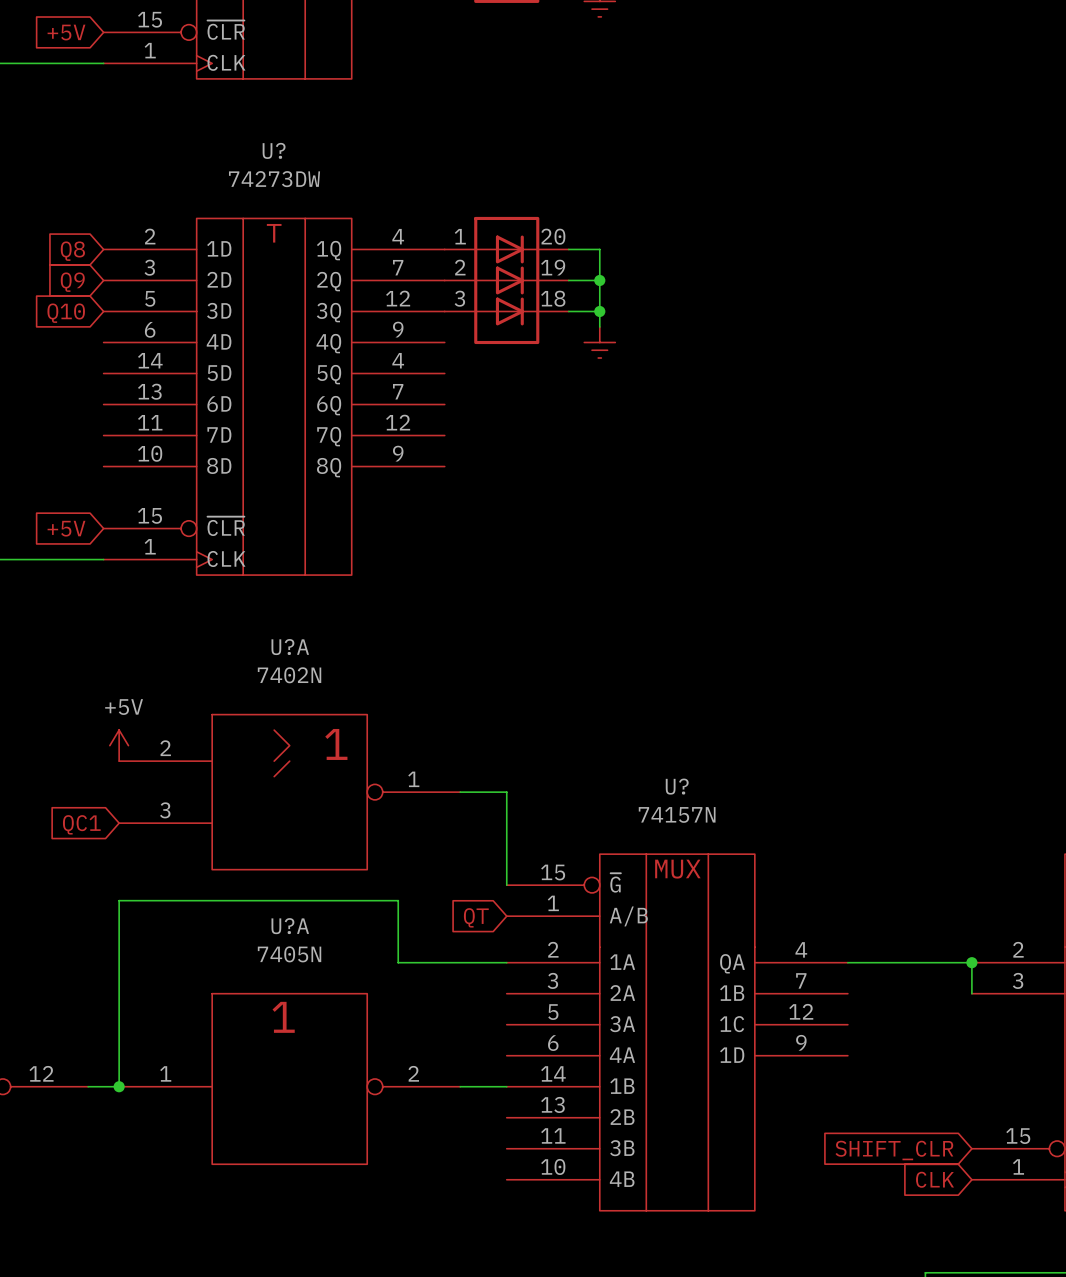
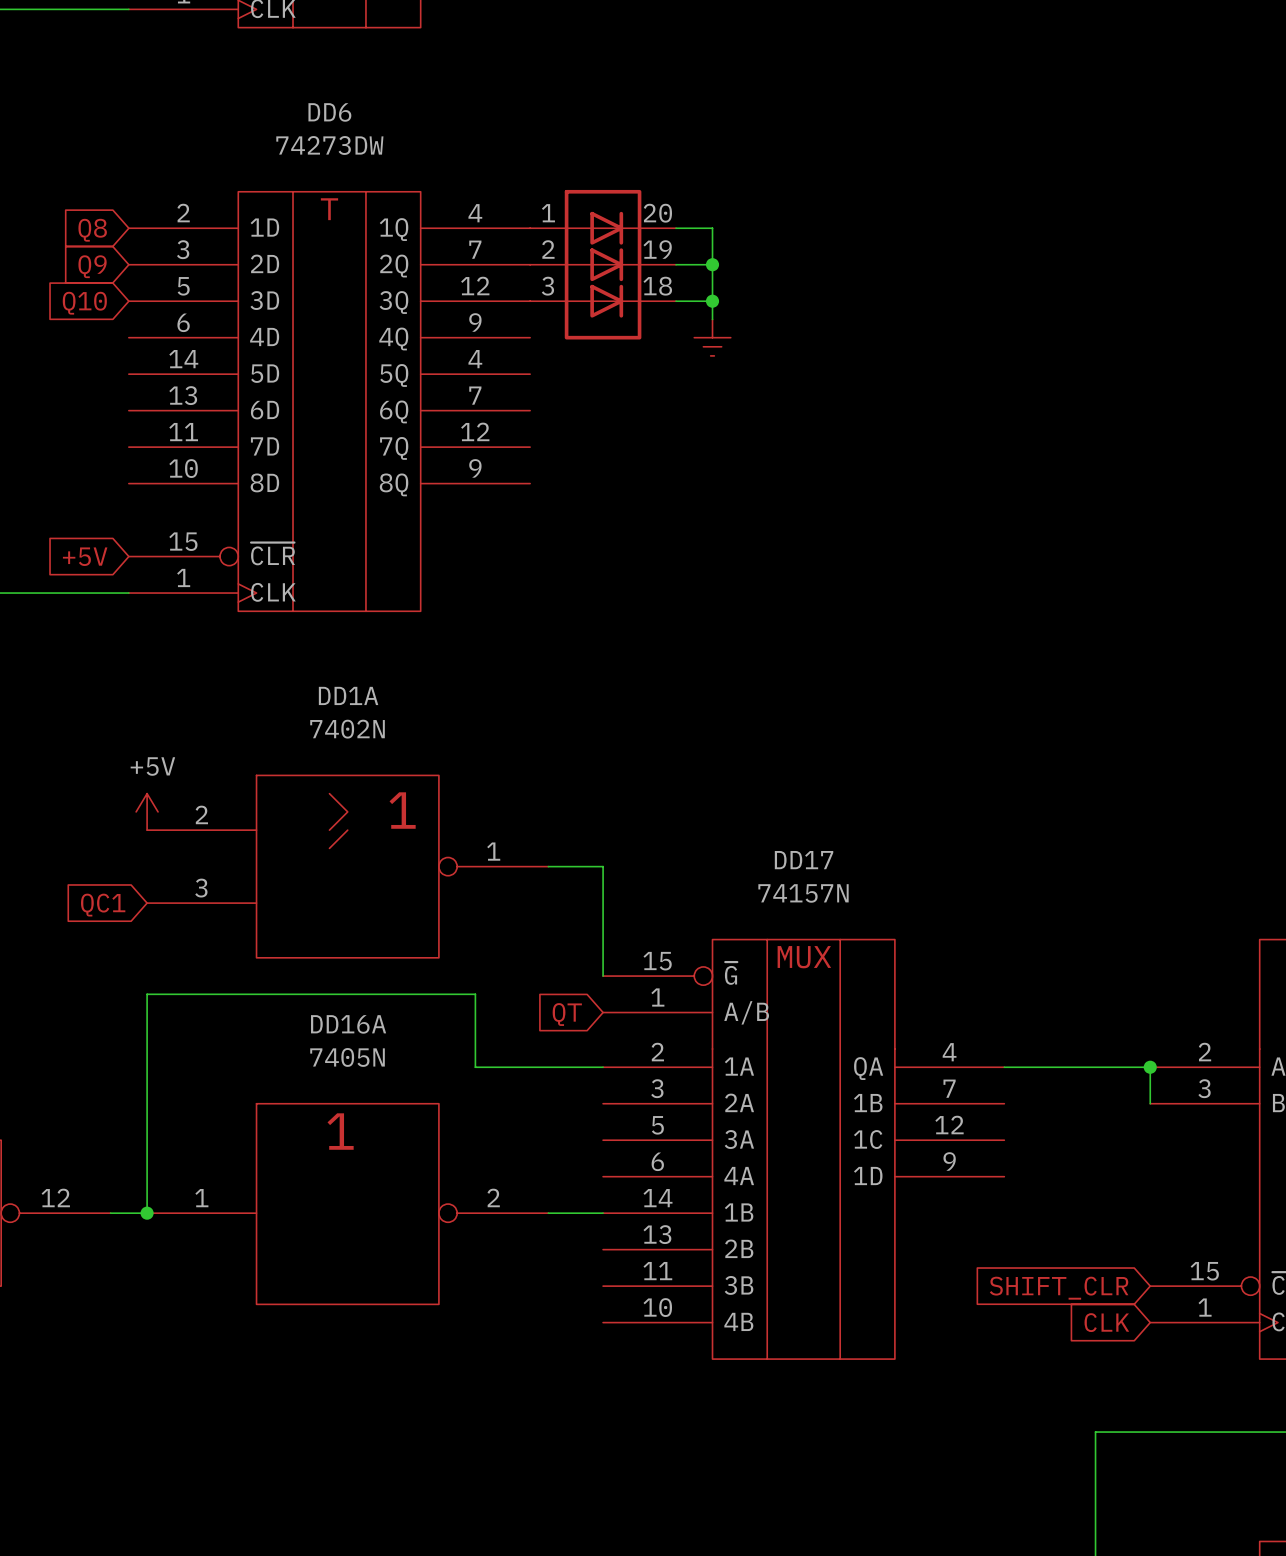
U? name: U? (274, 150) -> DD6 (329, 112)
U?A name: U?A (290, 647) -> DD1A (348, 695)
U? name: U? (677, 786) -> DD17 (804, 860)
U?A name: U?A (290, 926) -> DD16A (348, 1024)

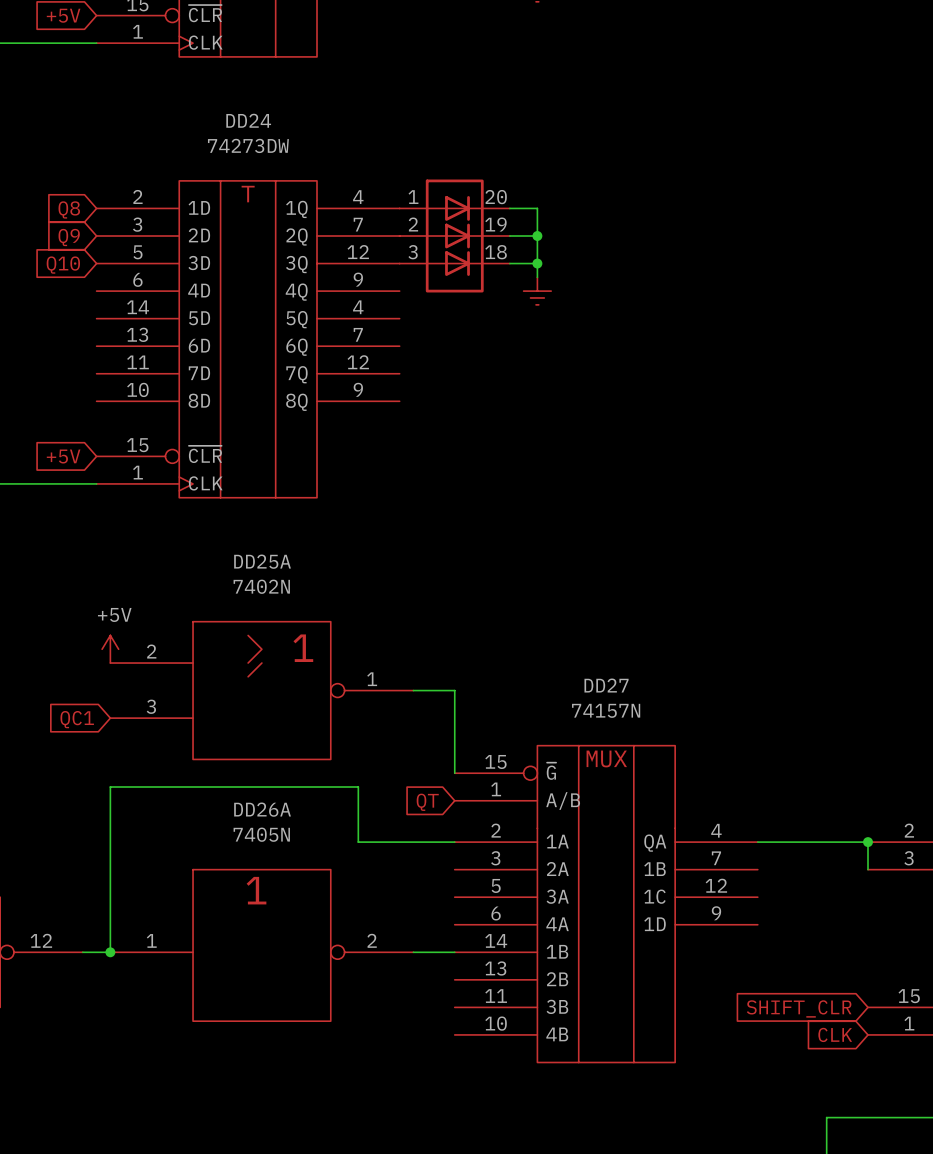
DD6 name: DD6 (329, 112) -> DD24 (248, 120)
DD1A name: DD1A (348, 695) -> DD25A (262, 561)
DD17 name: DD17 (804, 860) -> DD27 (606, 685)
DD16A name: DD16A (348, 1024) -> DD26A (262, 809)

